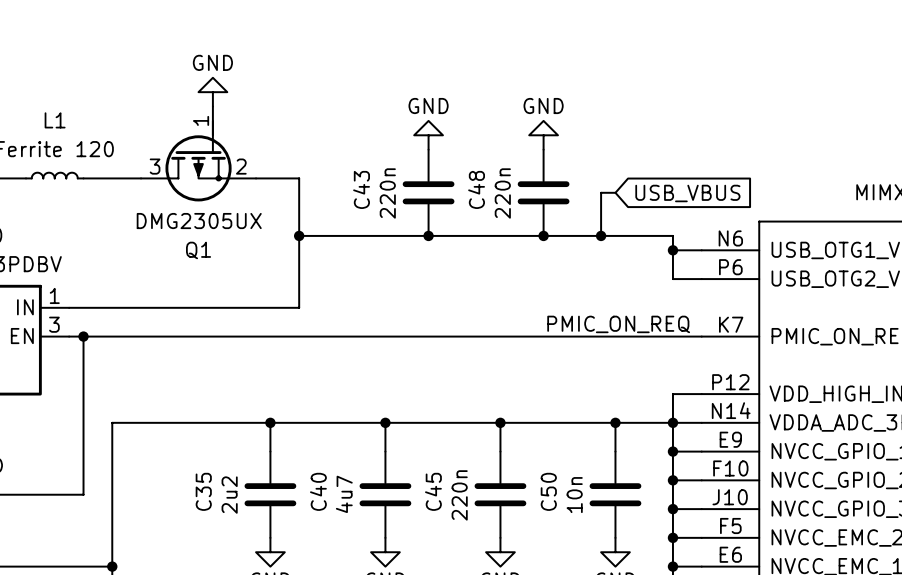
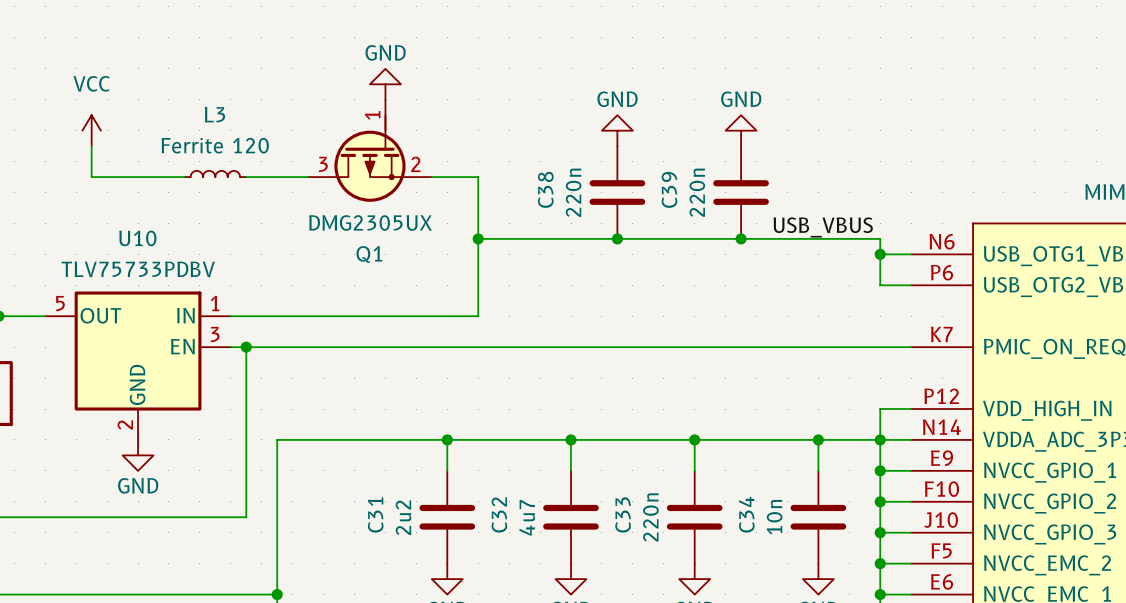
L1 name: L1 (55, 120) -> L3 (214, 114)
C43 name: C43 (361, 189) -> C38 (545, 189)
C48 name: C48 (476, 189) -> C39 (669, 189)
wire: (615, 192) (601, 192) (601, 235) -> none
global label: USB_VBUS (687, 193) -> none
label: none -> USB_VBUS (823, 227)
junction: (601, 235) -> none
label: PMIC_ON_REQ (618, 324) -> none
C35 name: C35 (203, 491) -> C31 (375, 514)
C40 name: C40 (318, 491) -> C32 (499, 514)
C45 name: C45 (433, 491) -> C33 (623, 514)
C50 name: C50 (548, 491) -> C34 (746, 514)

